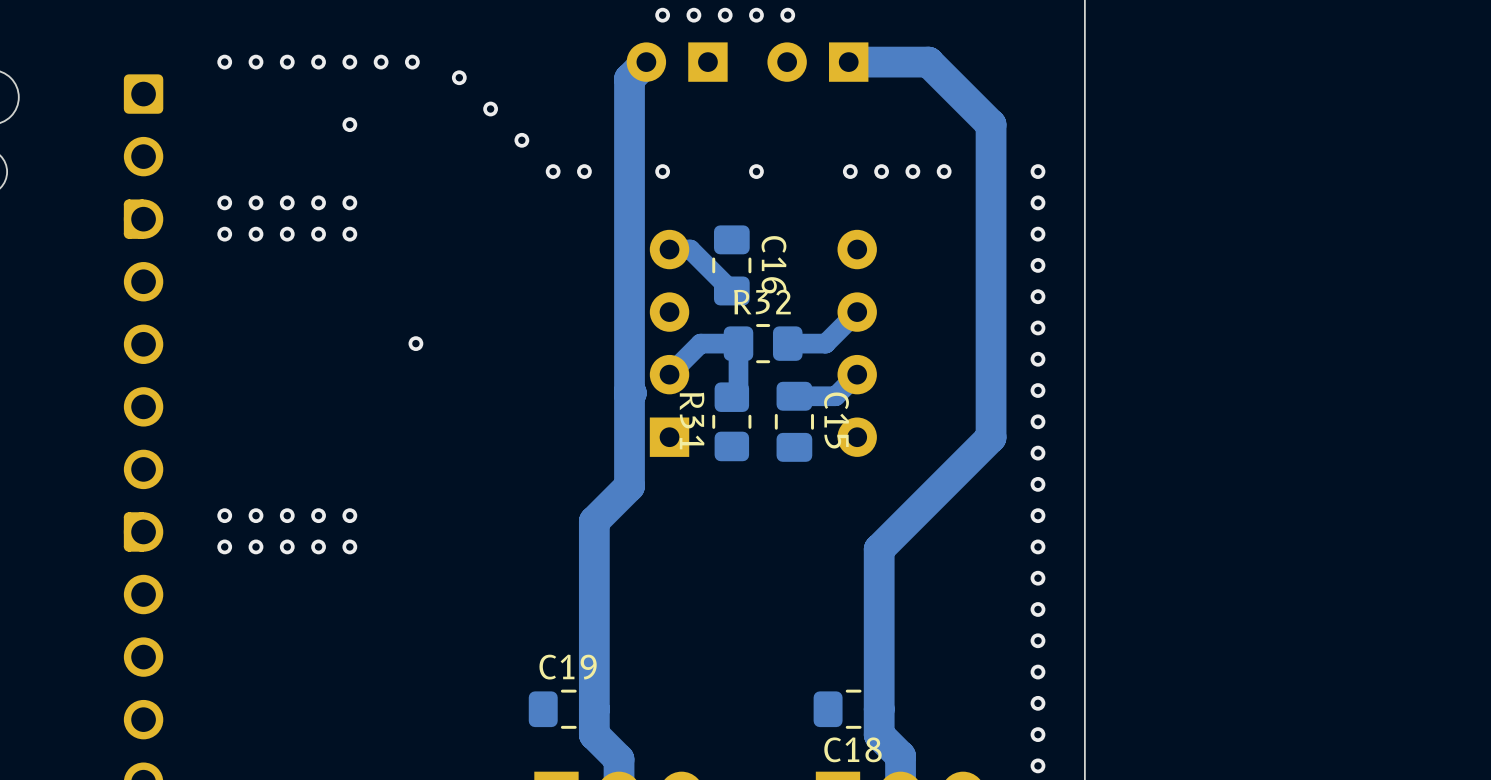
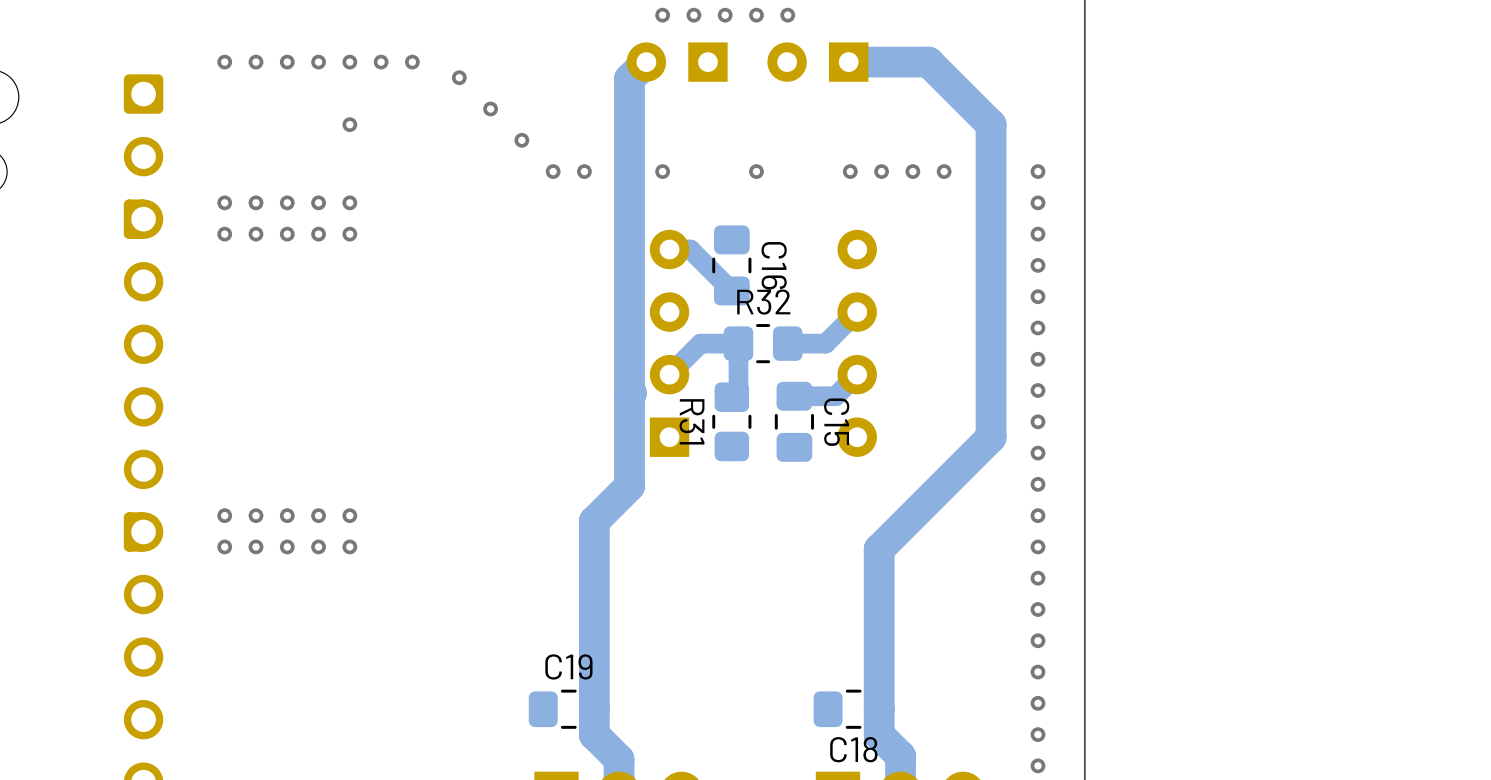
via: (415, 343) -> none

